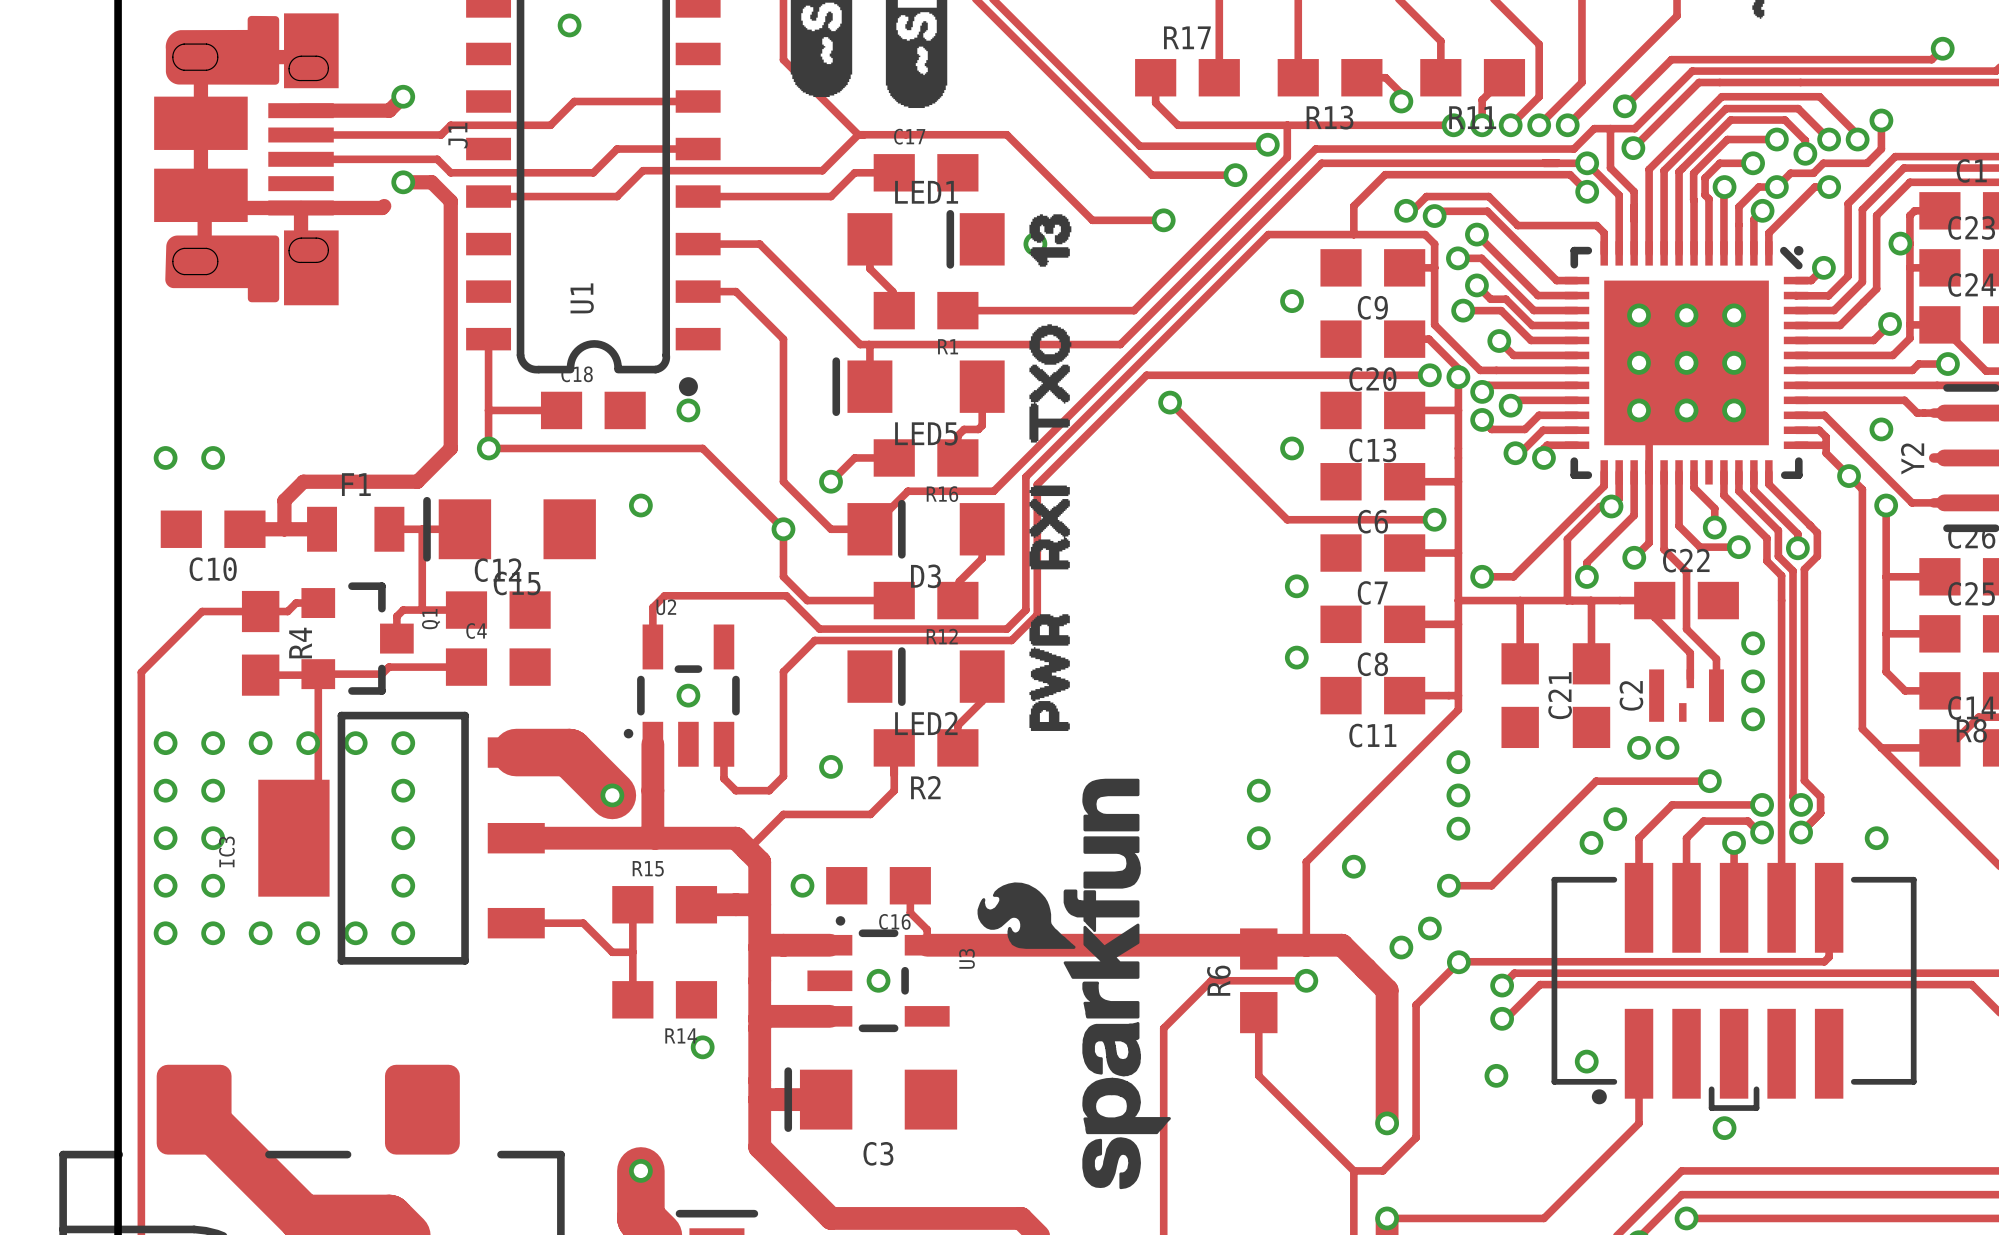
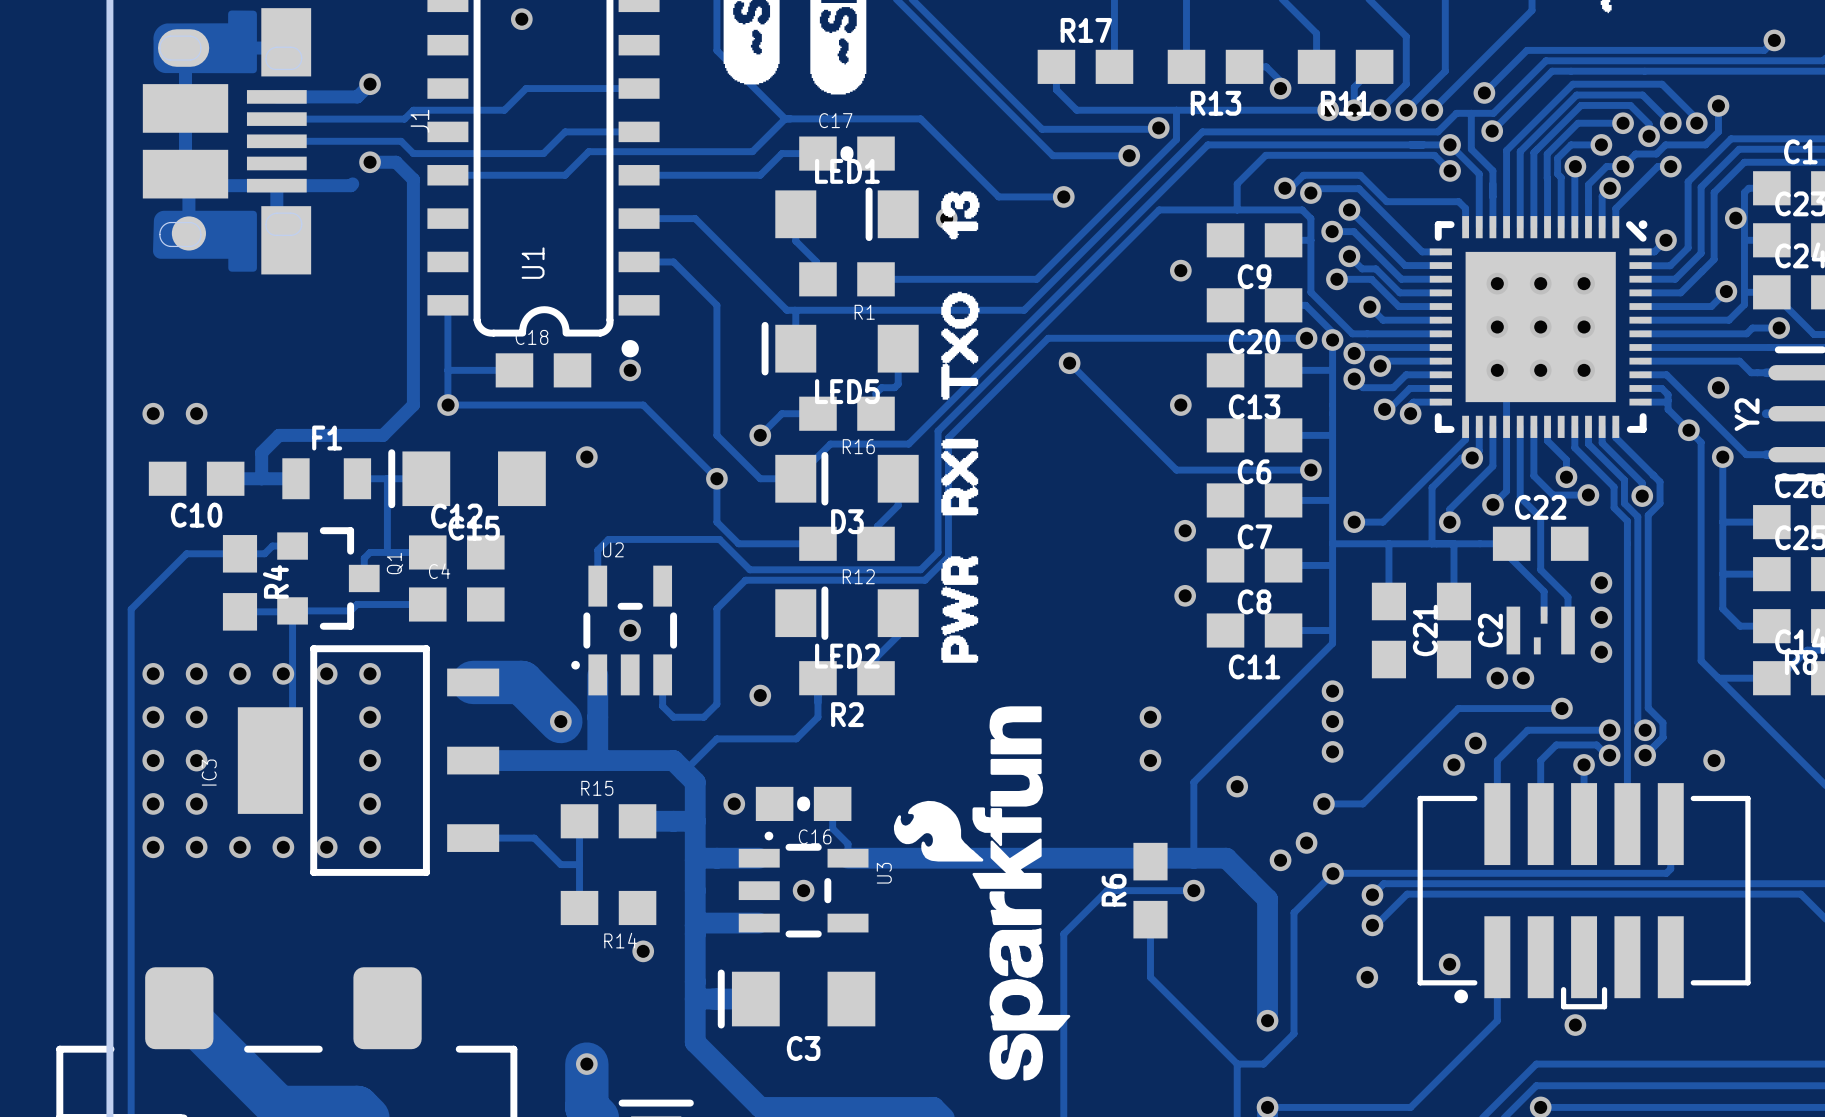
C17 footprint: [873, 154, 979, 192] -> [799, 136, 895, 171]
C16 footprint: [826, 867, 931, 905] -> [755, 786, 852, 822]

